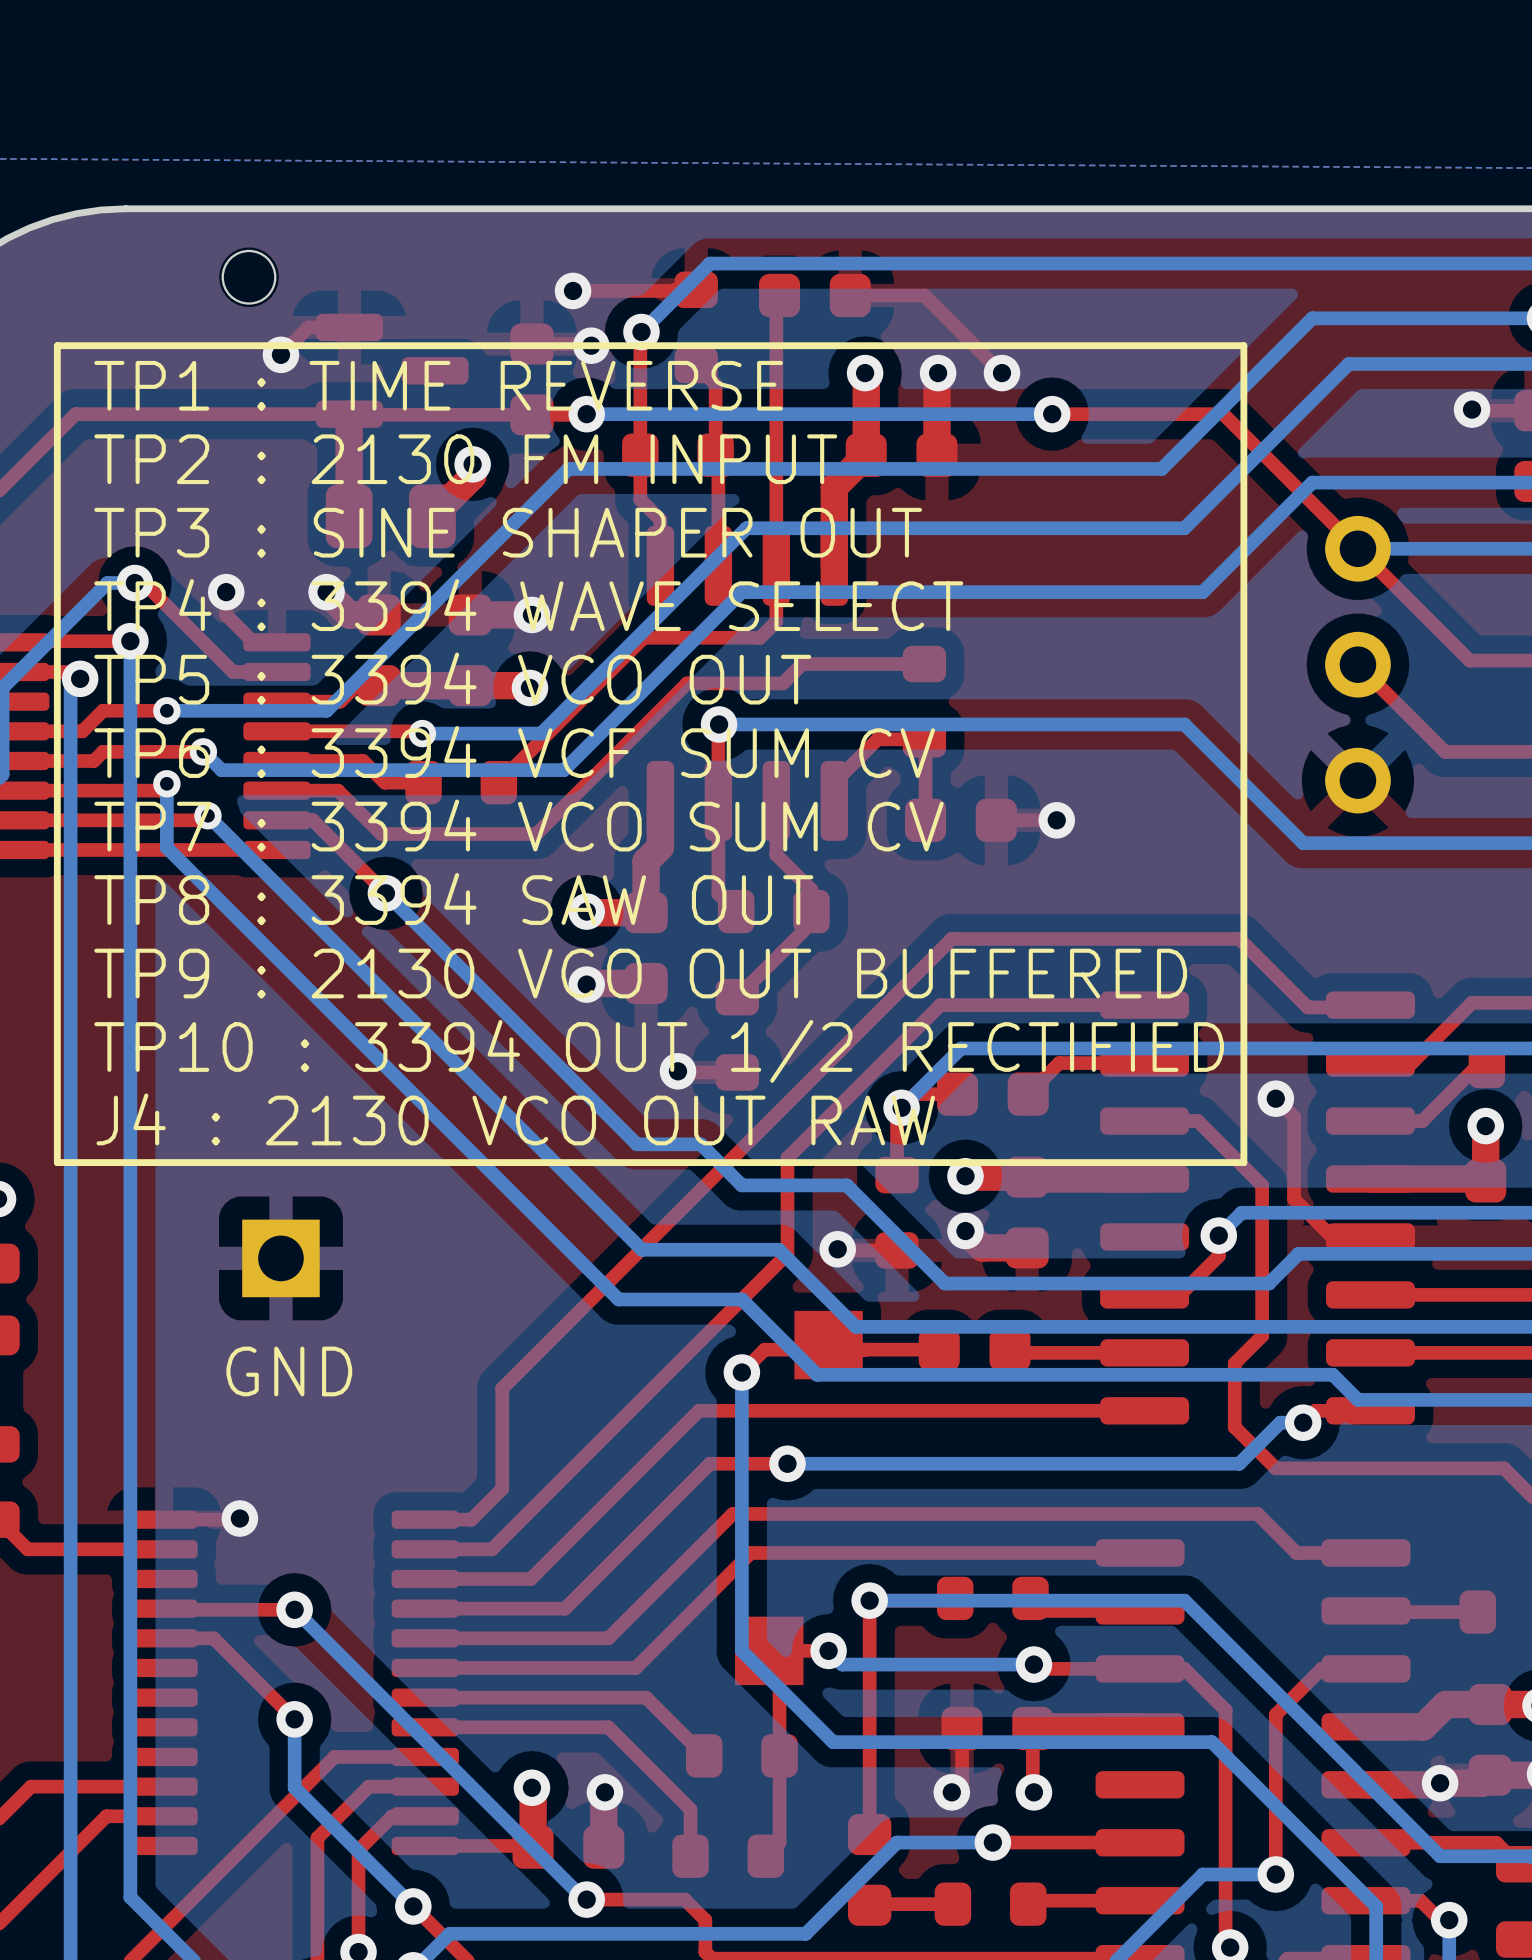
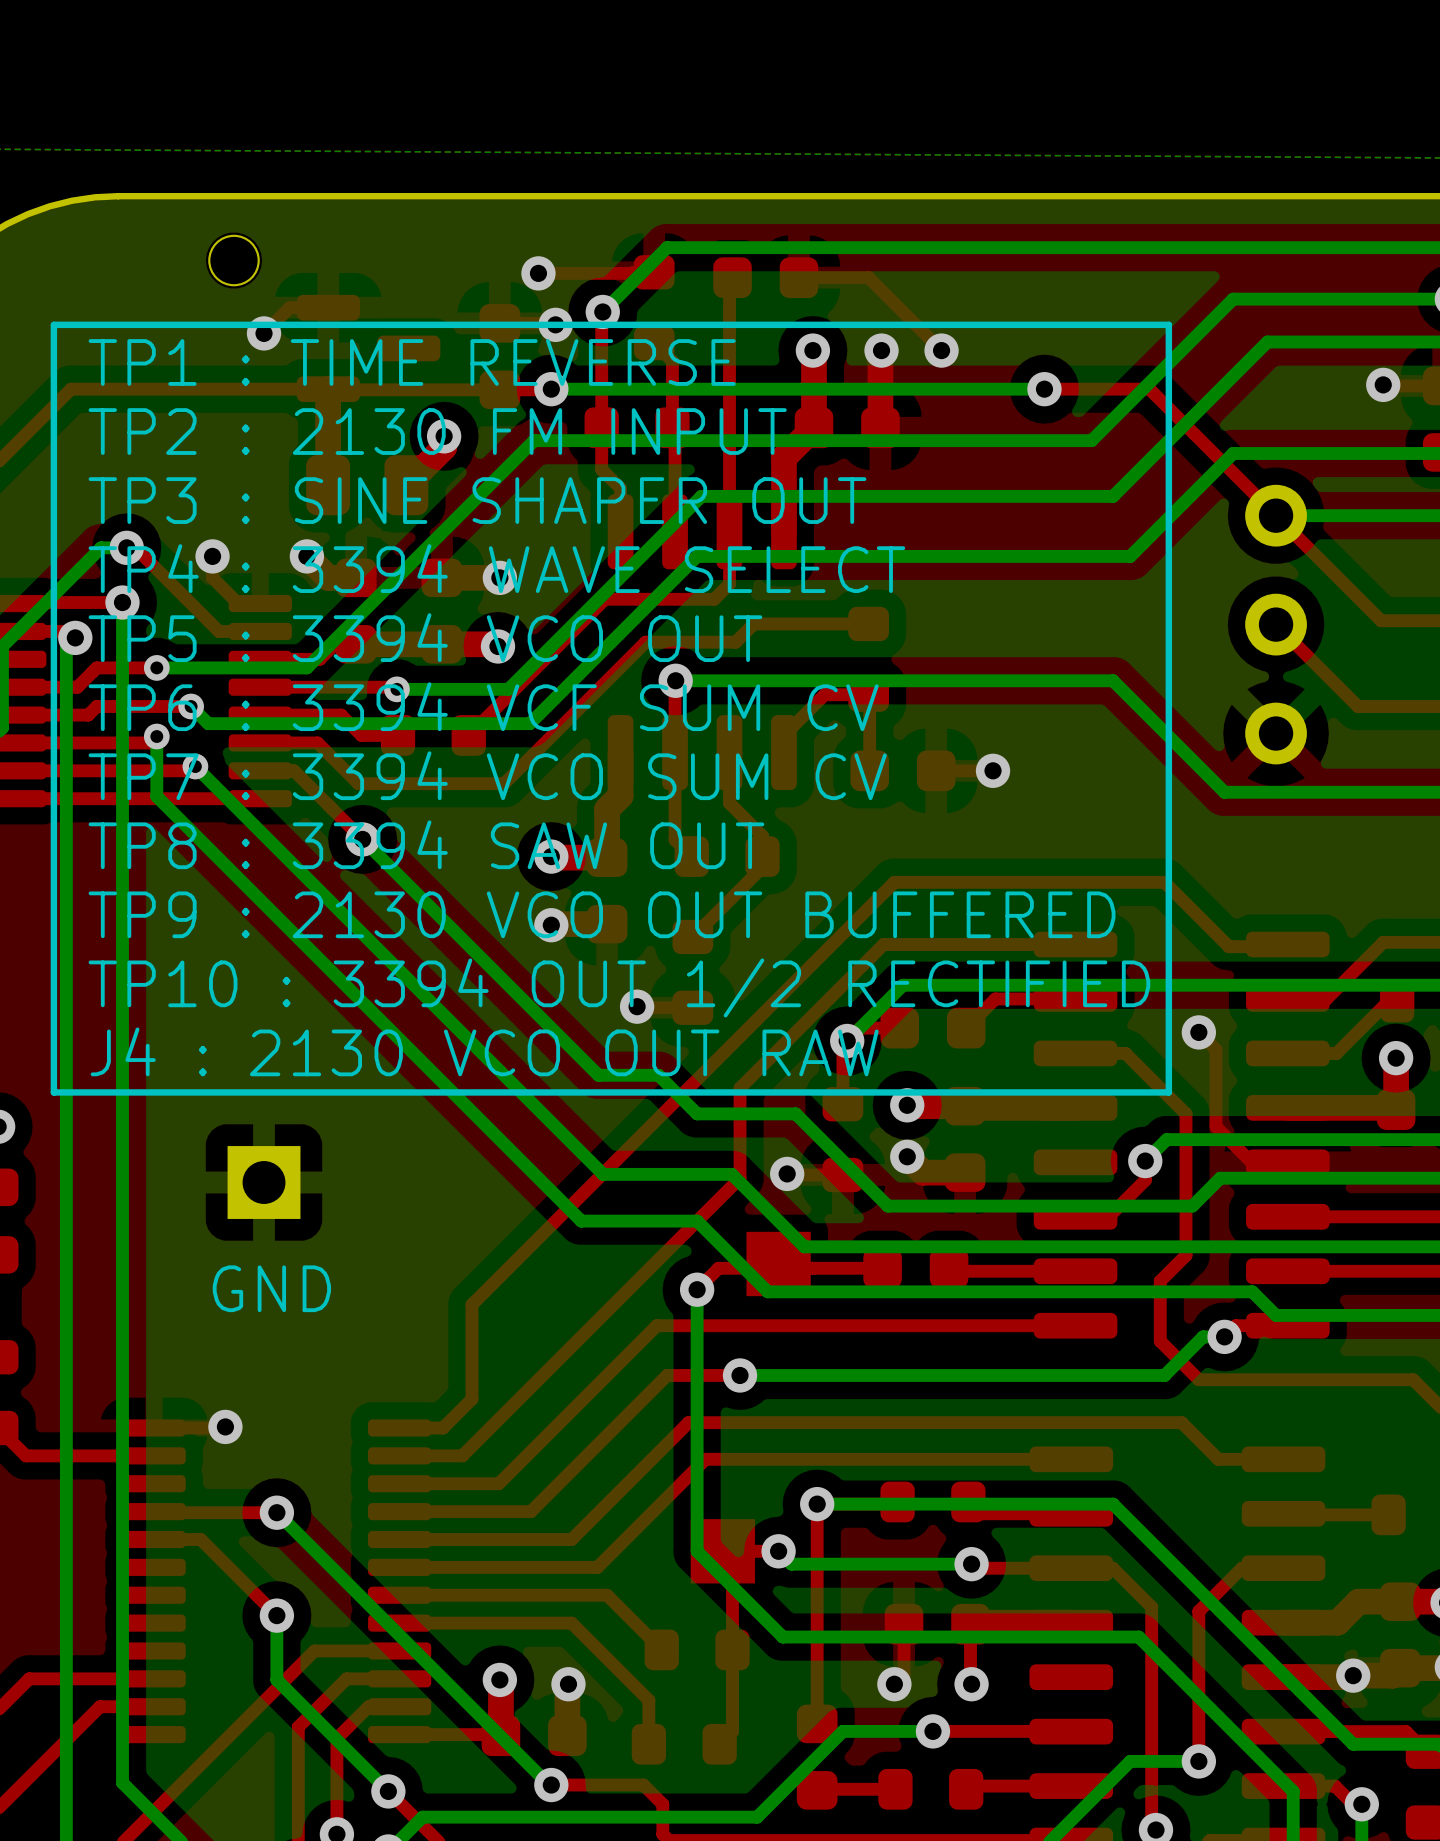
via position: (1052, 414) -> (1044, 389)
top track: (1111, 414) (1052, 414) -> none
bottom track: none -> (1044, 389) (988, 389)

